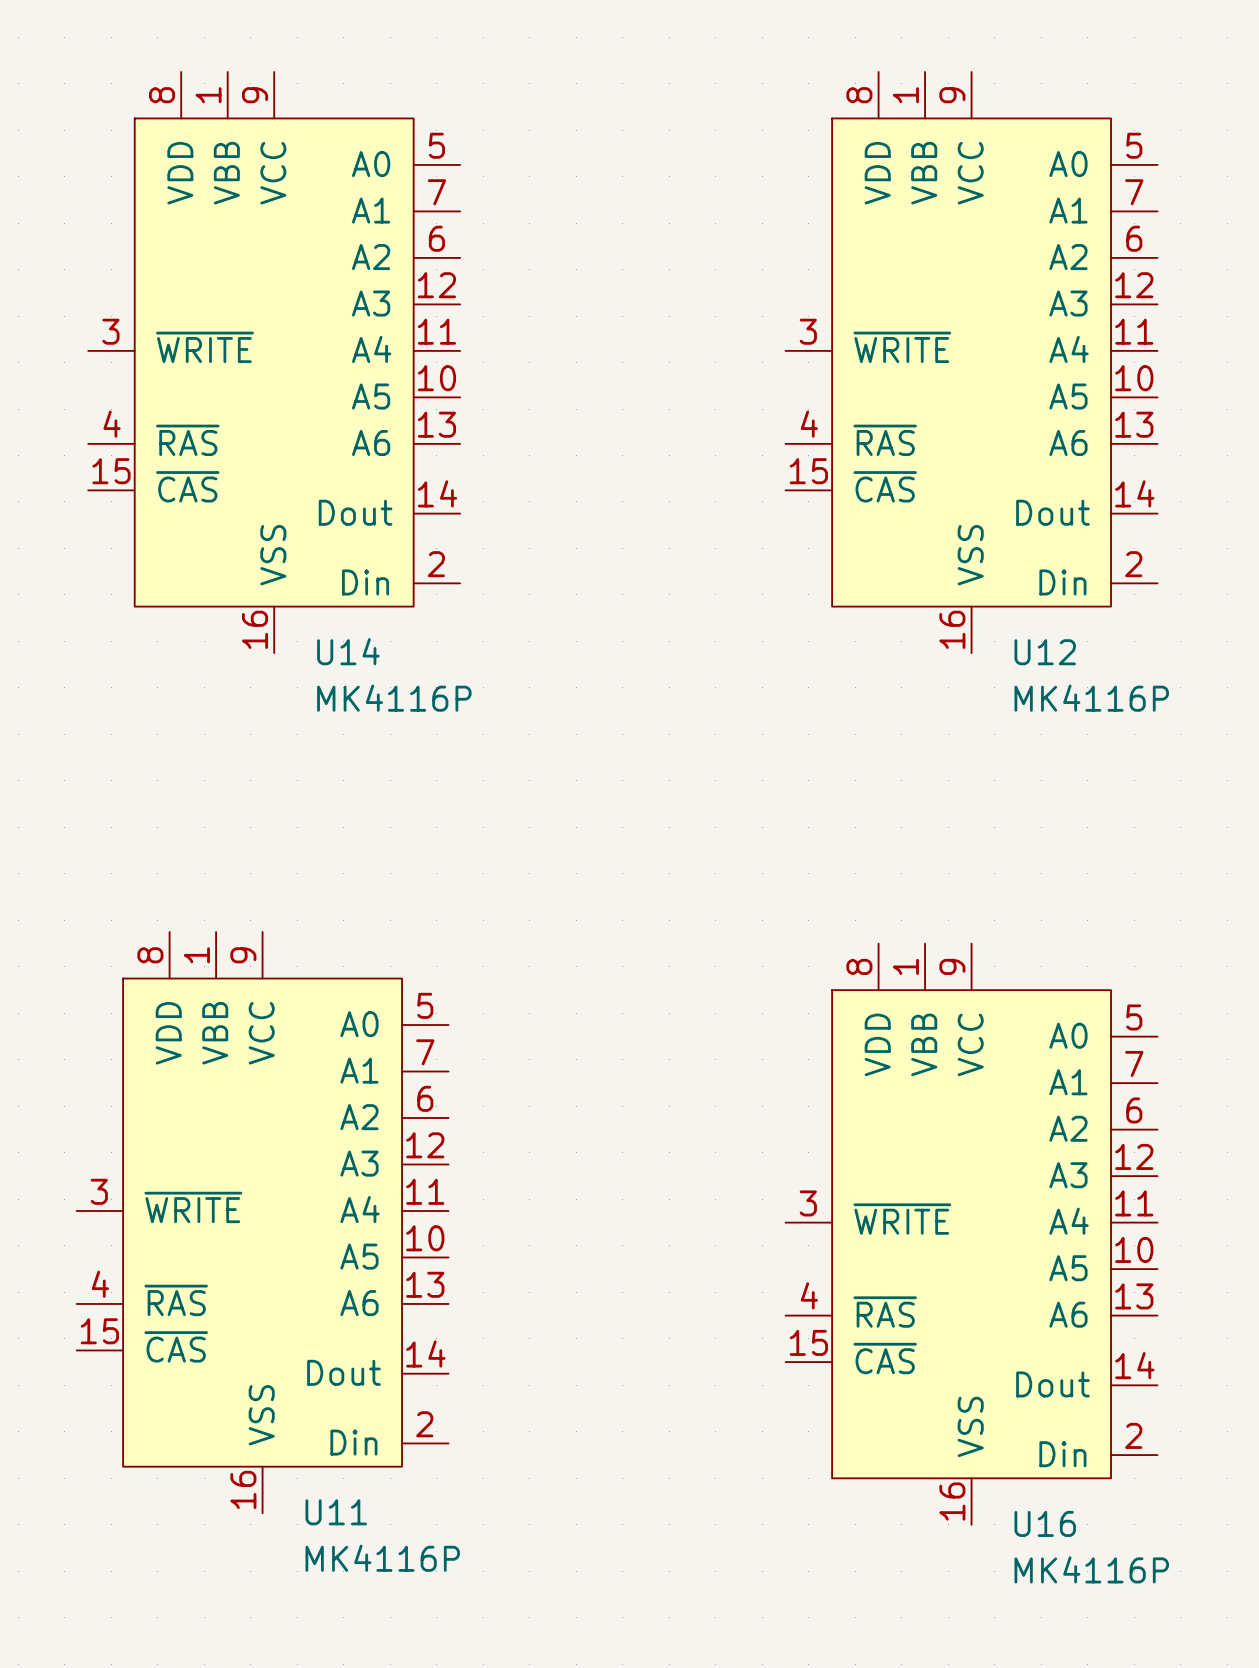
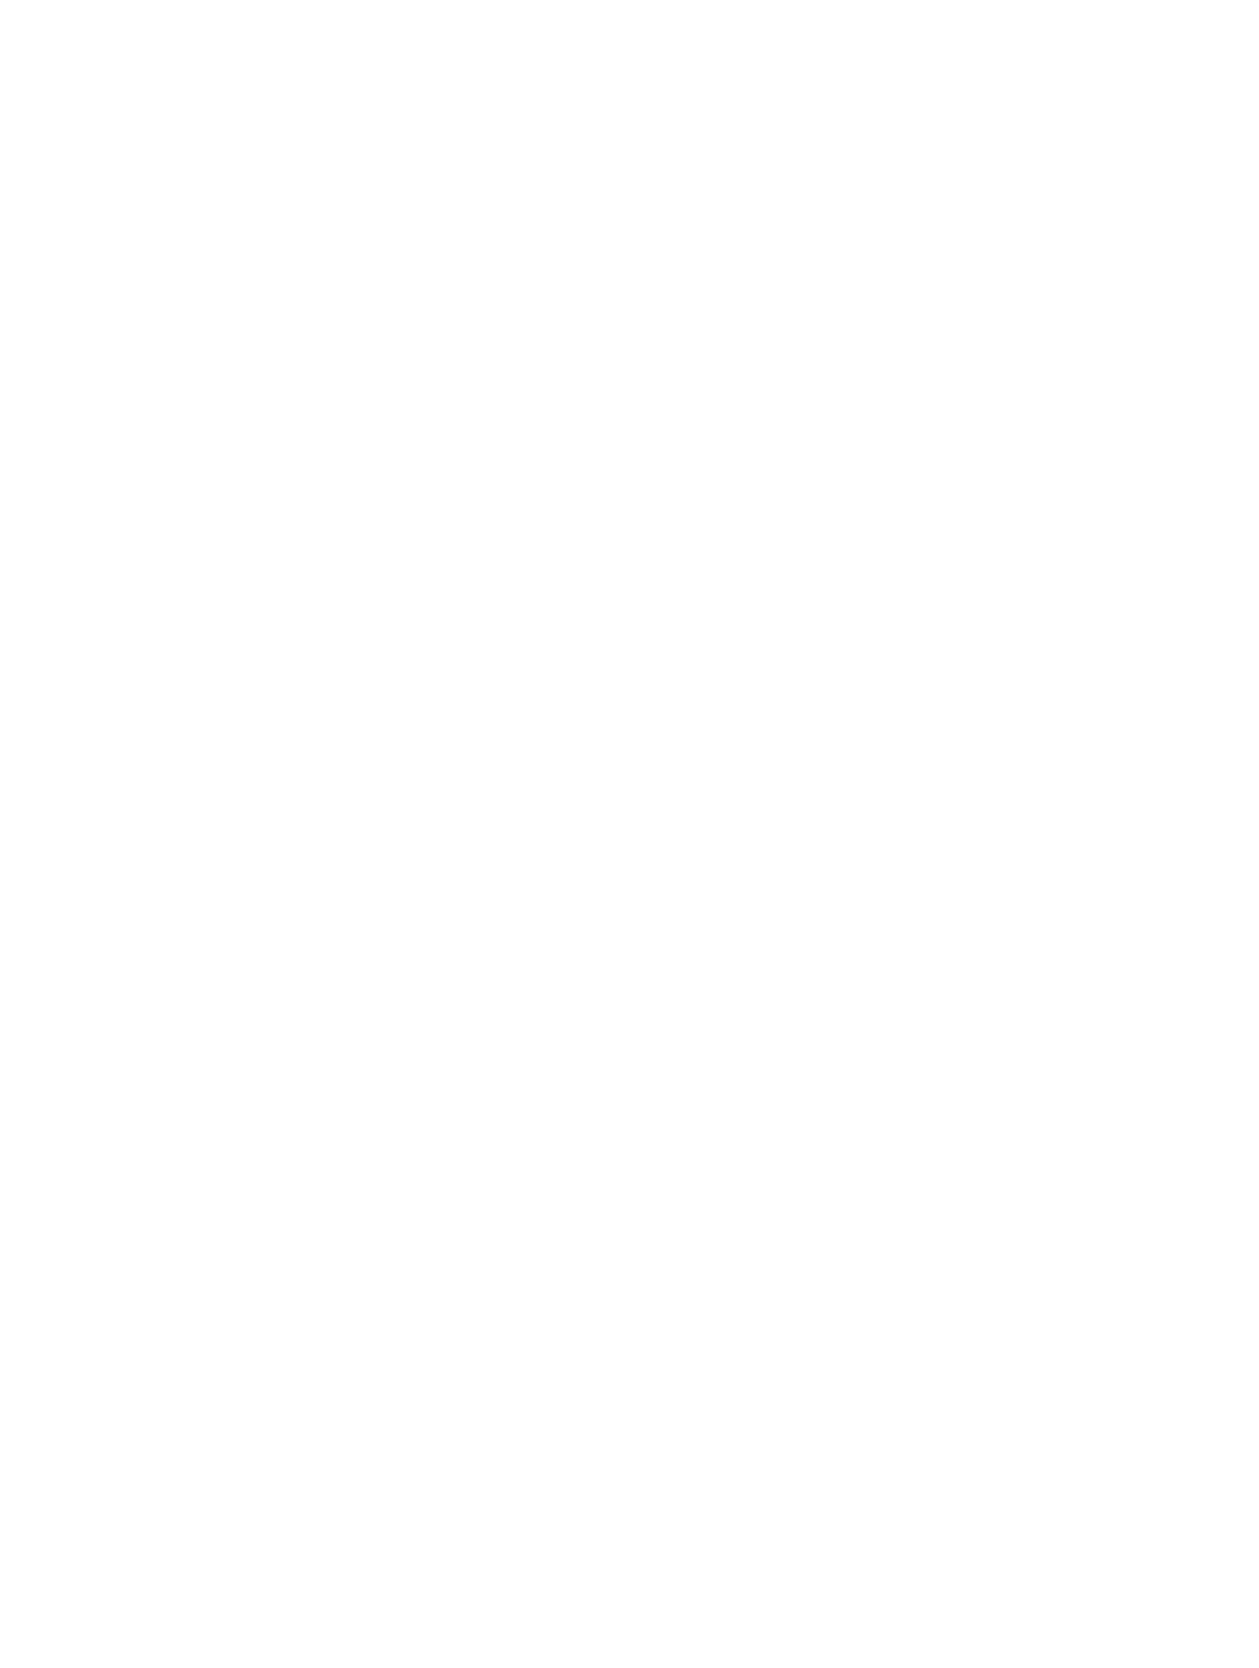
U14: MK4116P (274, 362) -> none
U12: MK4116P (971, 362) -> none
U11: MK4116P (262, 1222) -> none
U16: MK4116P (971, 1234) -> none

